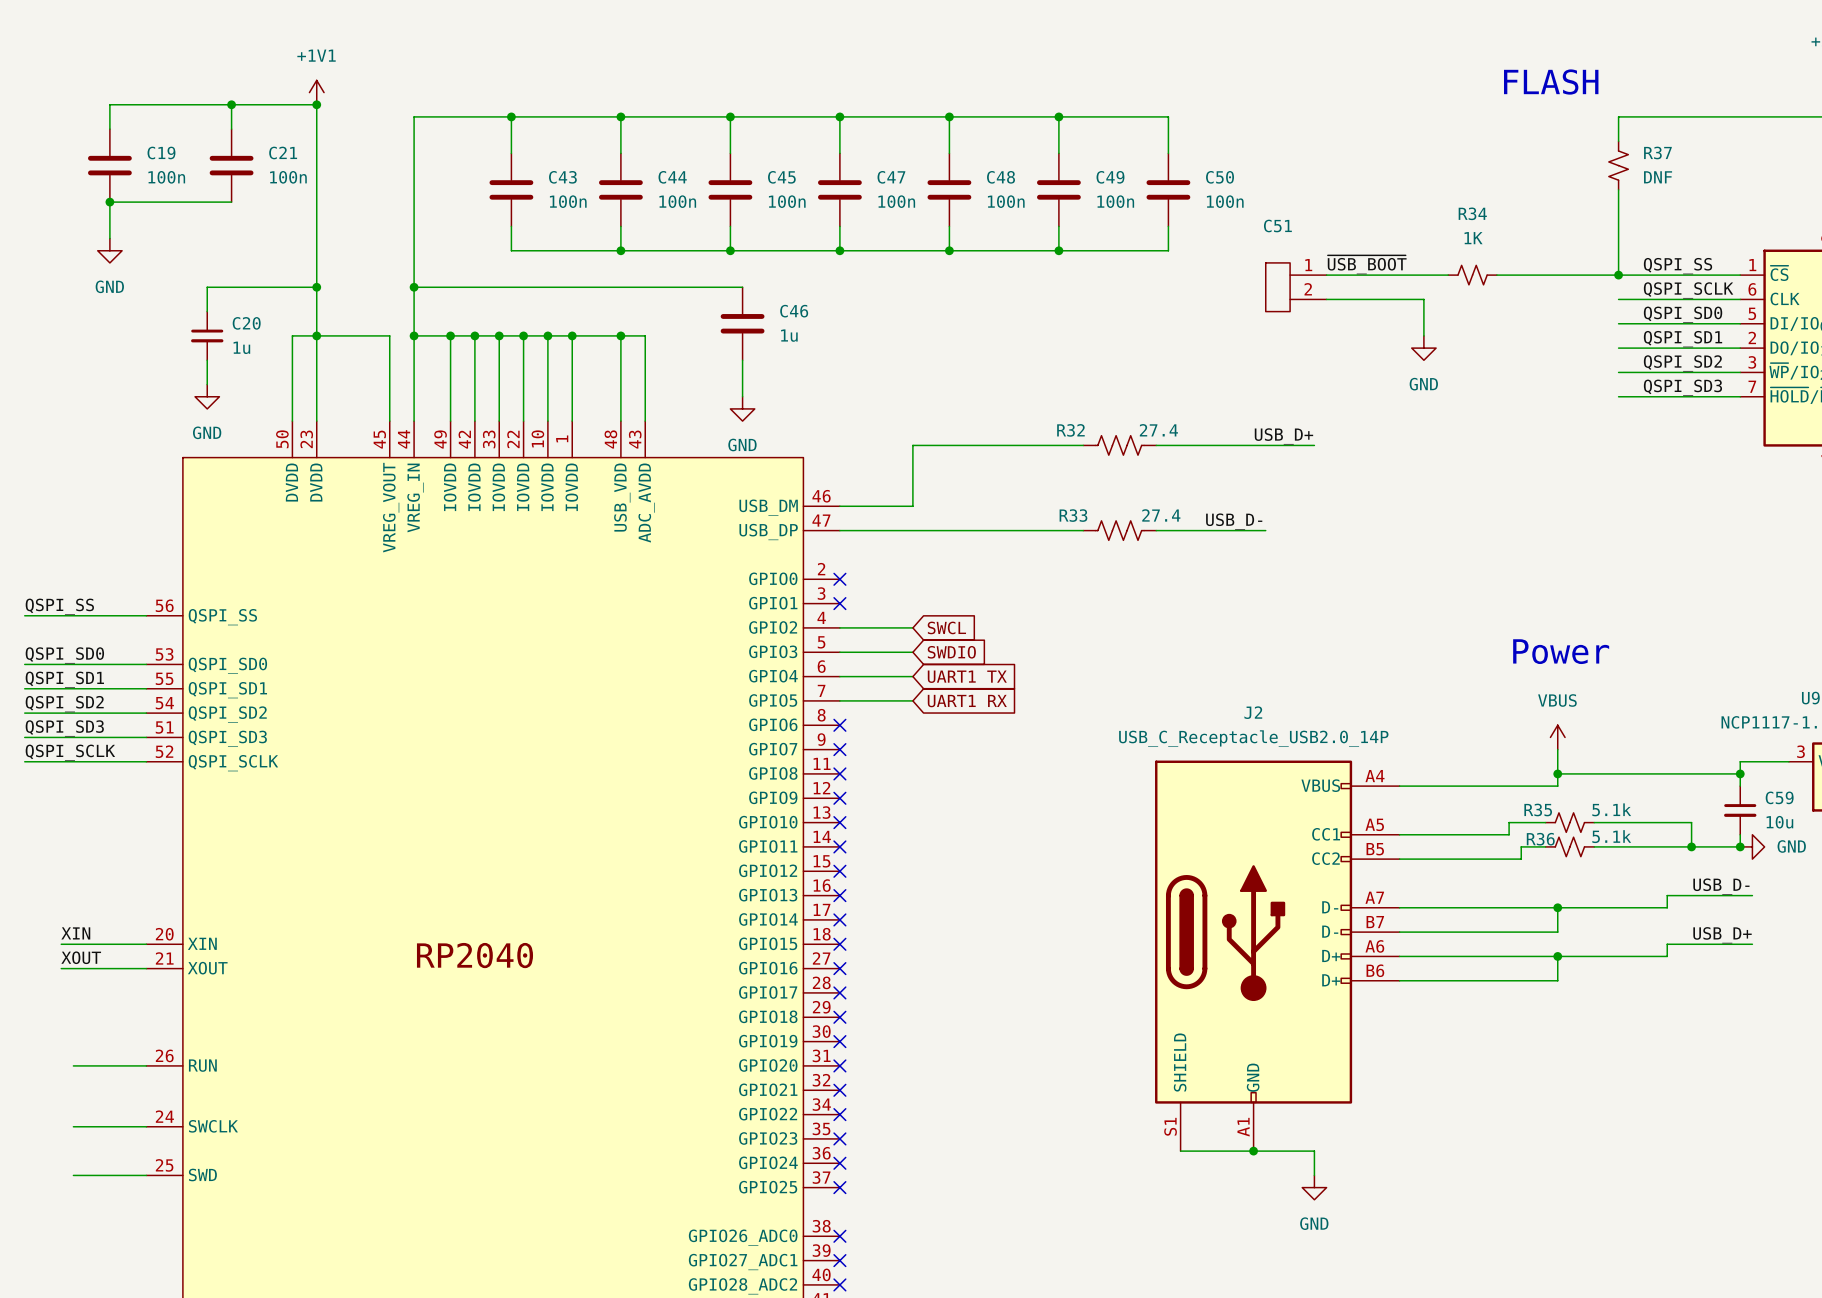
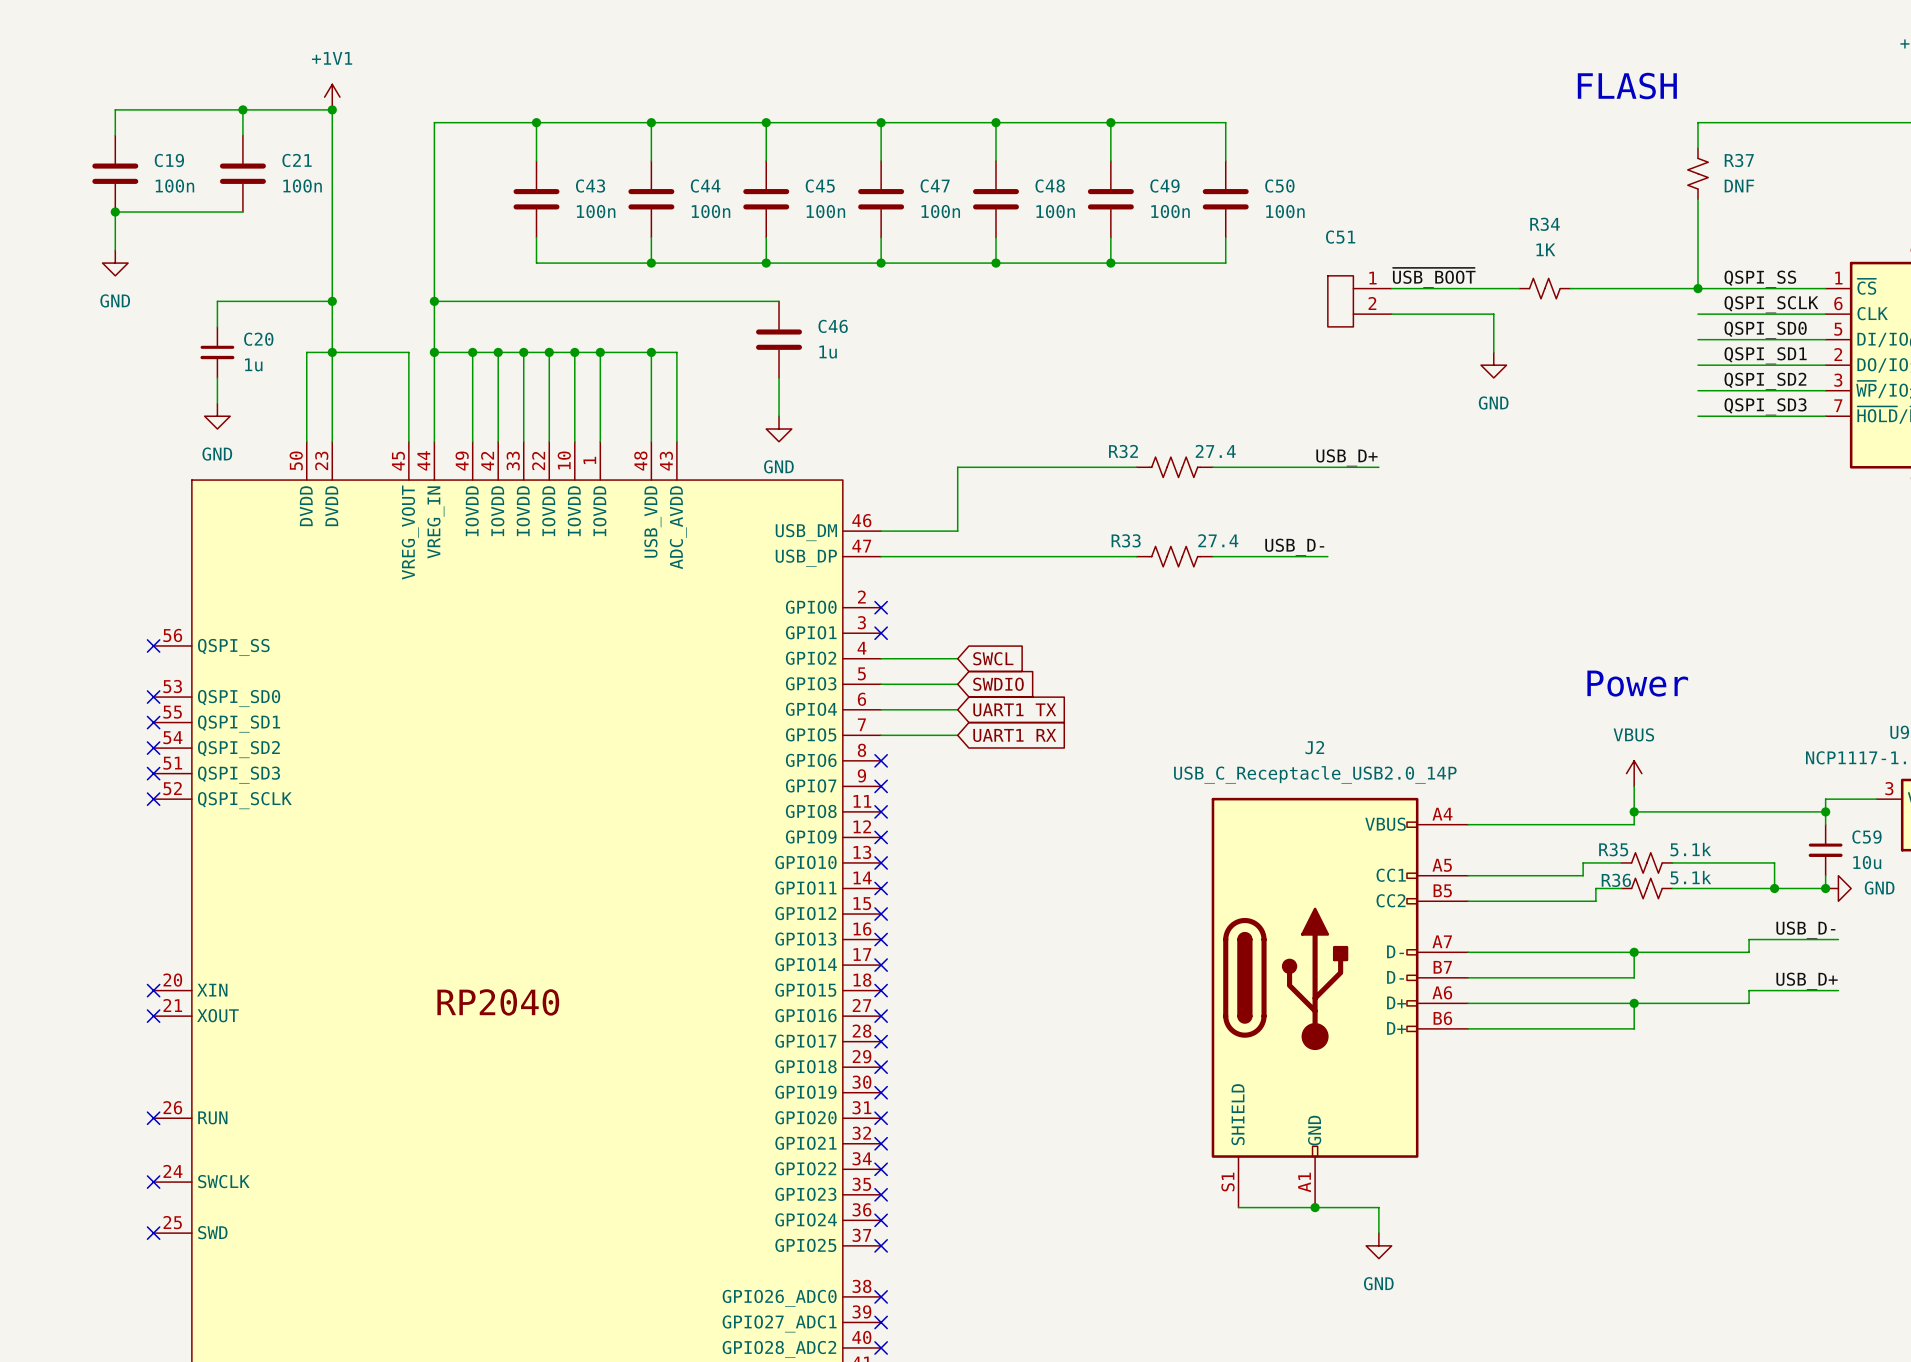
label: QSPI_SS (59, 606) -> none
wire: (24, 615) (146, 615) -> none
no-connect mark: none -> (153, 645)
label: QSPI_SD0 (64, 655) -> none
wire: (24, 664) (146, 664) -> none
no-connect mark: none -> (153, 697)
label: QSPI_SD1 (64, 679) -> none
wire: (24, 688) (146, 688) -> none
no-connect mark: none -> (153, 722)
label: QSPI_SD2 (64, 704) -> none
wire: (24, 713) (146, 713) -> none
no-connect mark: none -> (153, 748)
label: QSPI_SD3 (64, 728) -> none
wire: (24, 737) (146, 737) -> none
no-connect mark: none -> (153, 773)
label: QSPI_SCLK (70, 752) -> none
wire: (24, 761) (146, 761) -> none
no-connect mark: none -> (153, 799)
label: XIN (75, 933) -> none
wire: (61, 944) (146, 944) -> none
no-connect mark: none -> (153, 990)
label: XOUT (81, 957) -> none
wire: (61, 968) (146, 968) -> none
no-connect mark: none -> (153, 1016)
wire: (73, 1065) (146, 1065) -> none
no-connect mark: none -> (153, 1118)
wire: (73, 1126) (146, 1126) -> none
no-connect mark: none -> (153, 1182)
wire: (73, 1175) (146, 1175) -> none
no-connect mark: none -> (153, 1233)

